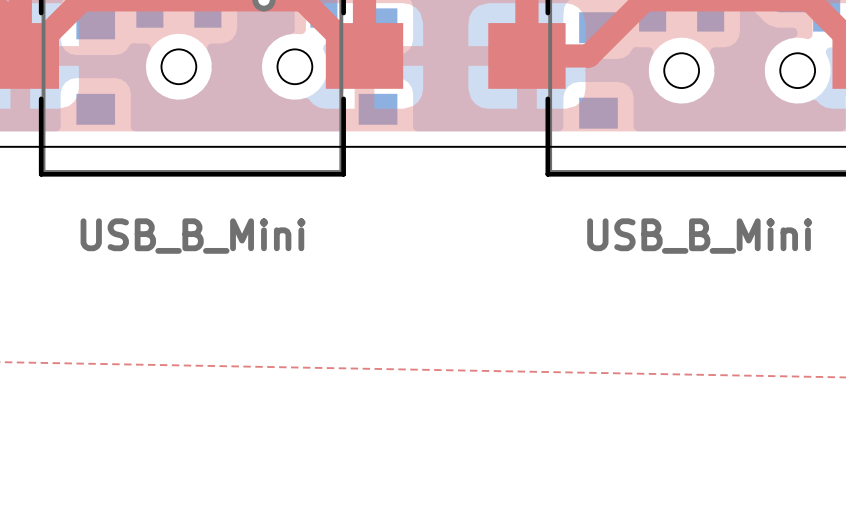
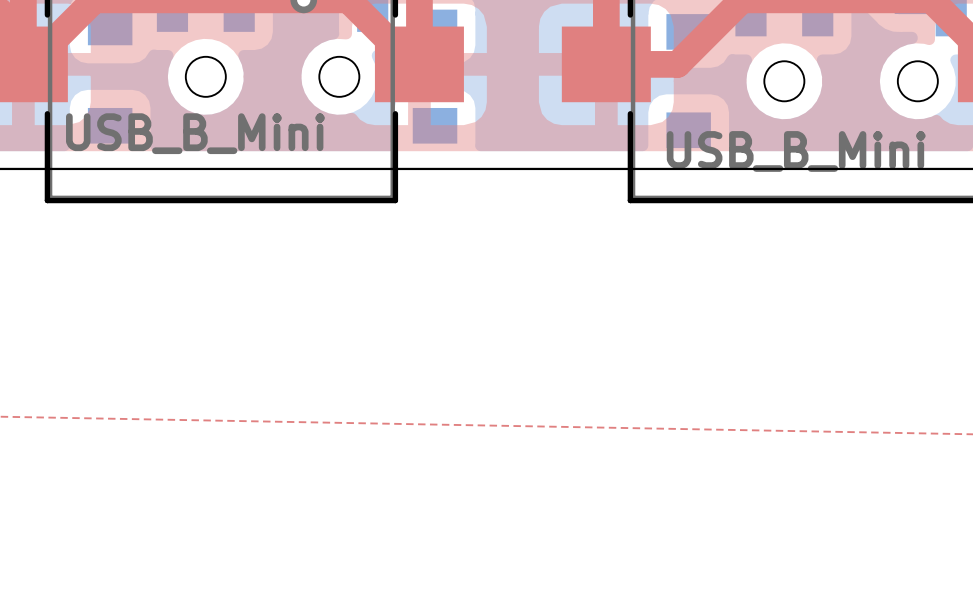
part value position: USB_B_Mini (193, 236) -> USB_B_Mini (195, 133)
part value position: USB_B_Mini (699, 236) -> USB_B_Mini (796, 151)

